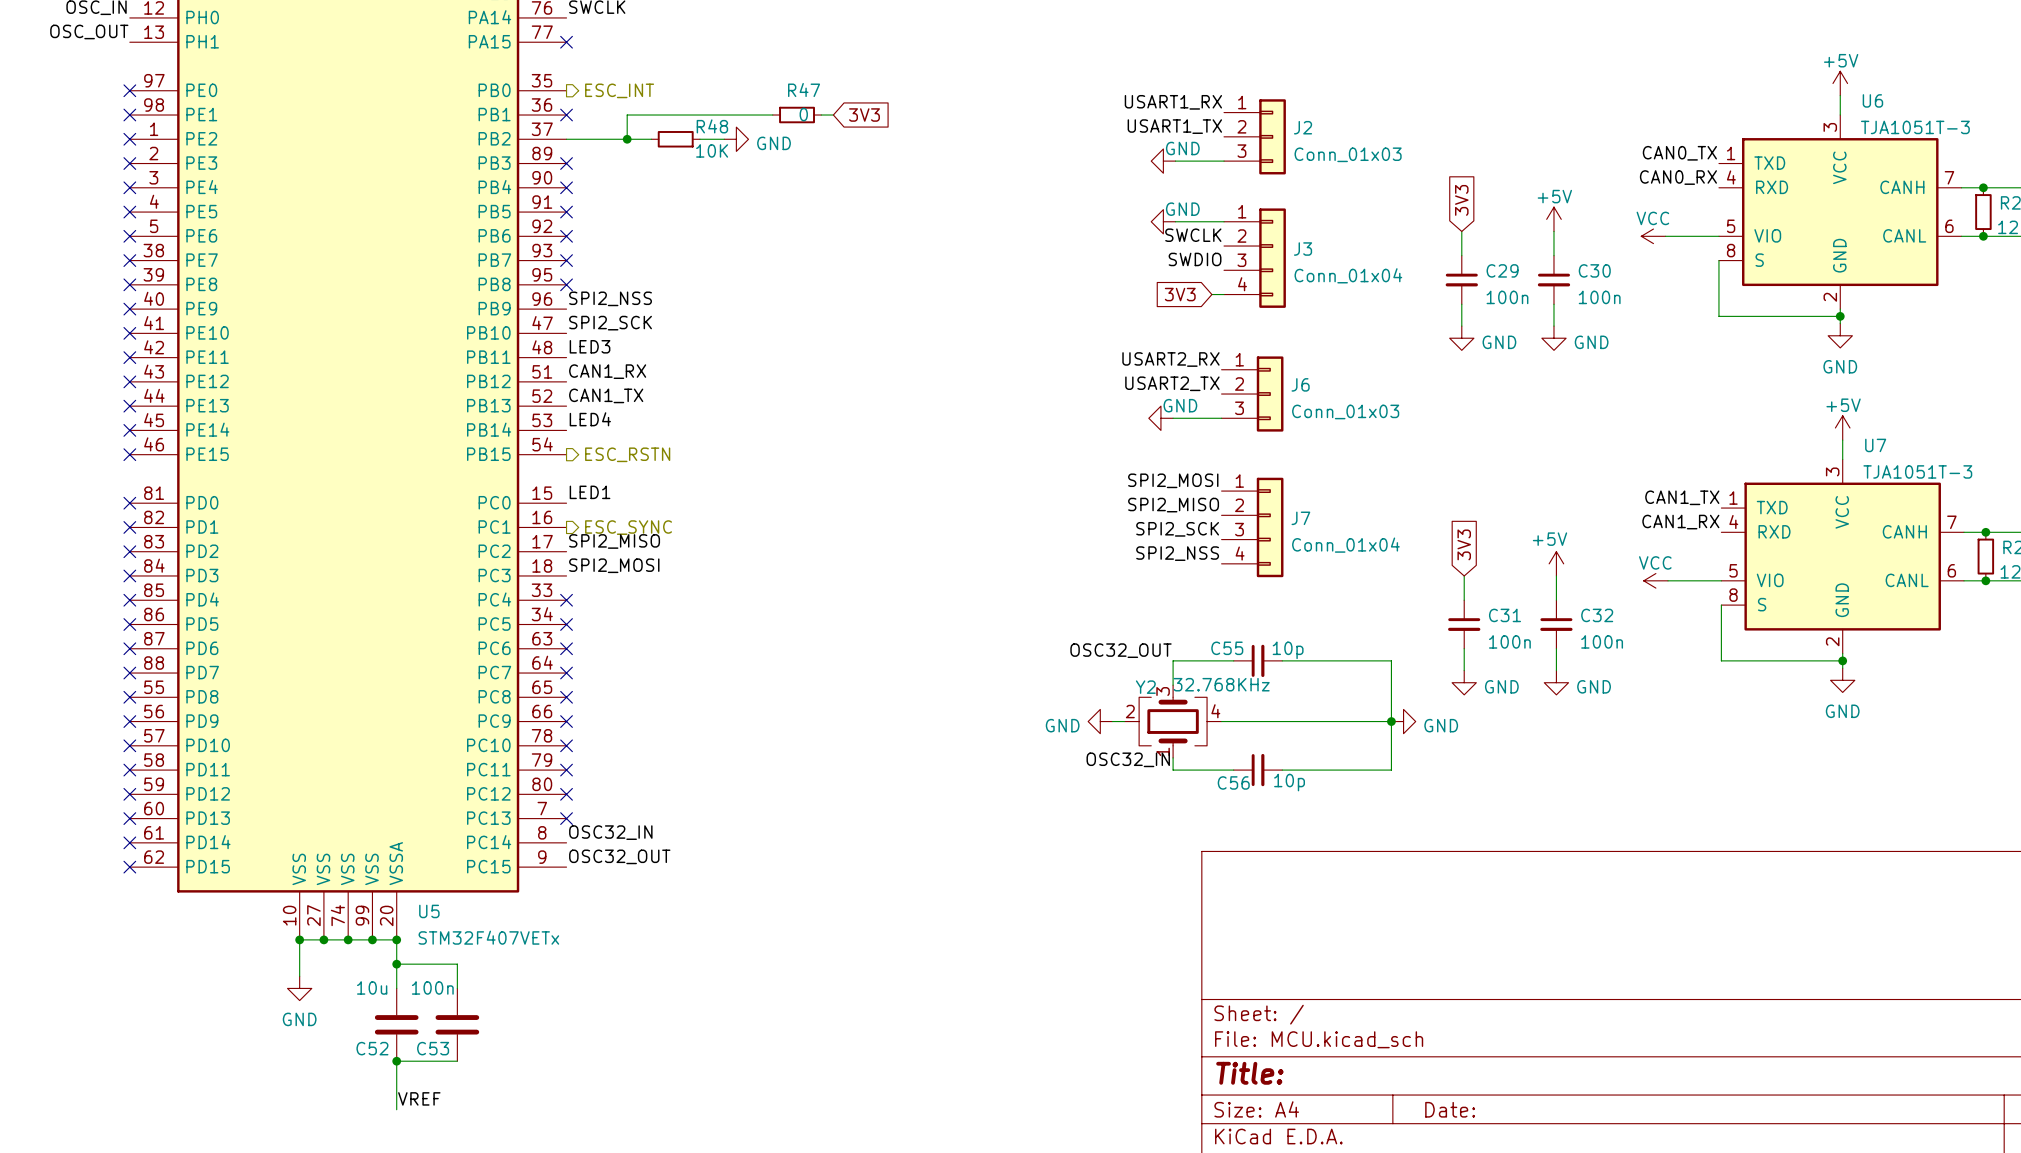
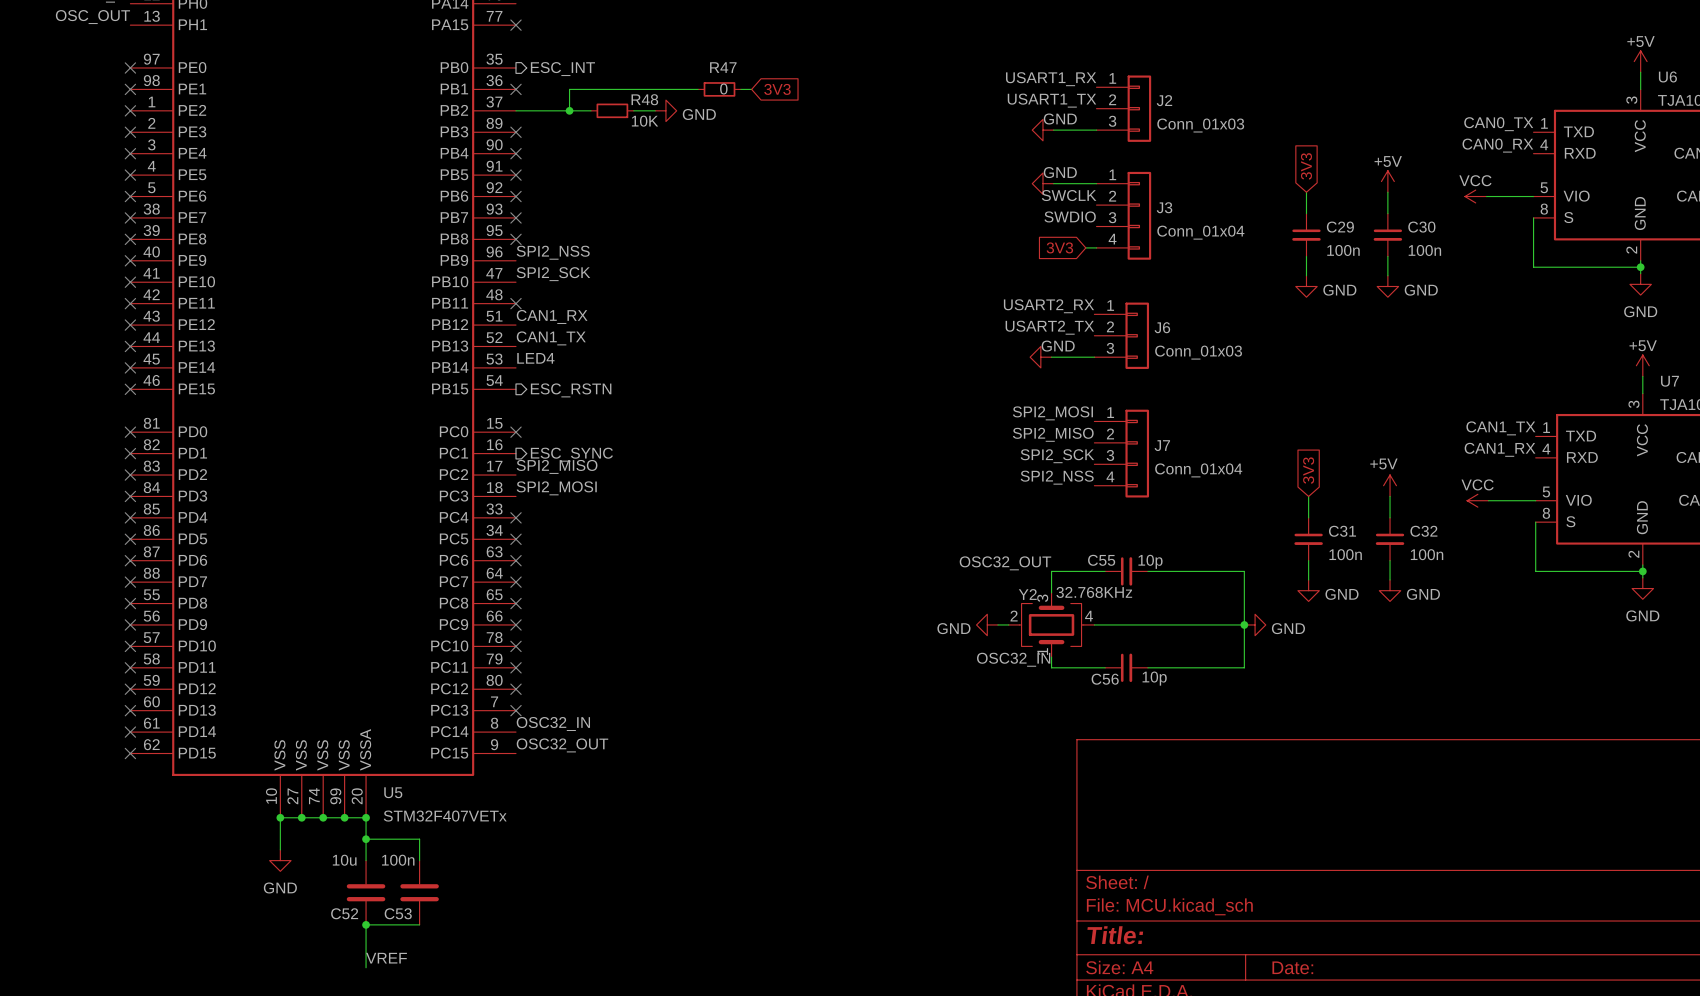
label: LED3 (590, 346) -> none
no-connect mark: none -> (515, 303)
label: LED1 (590, 492) -> none
no-connect mark: none -> (515, 432)

